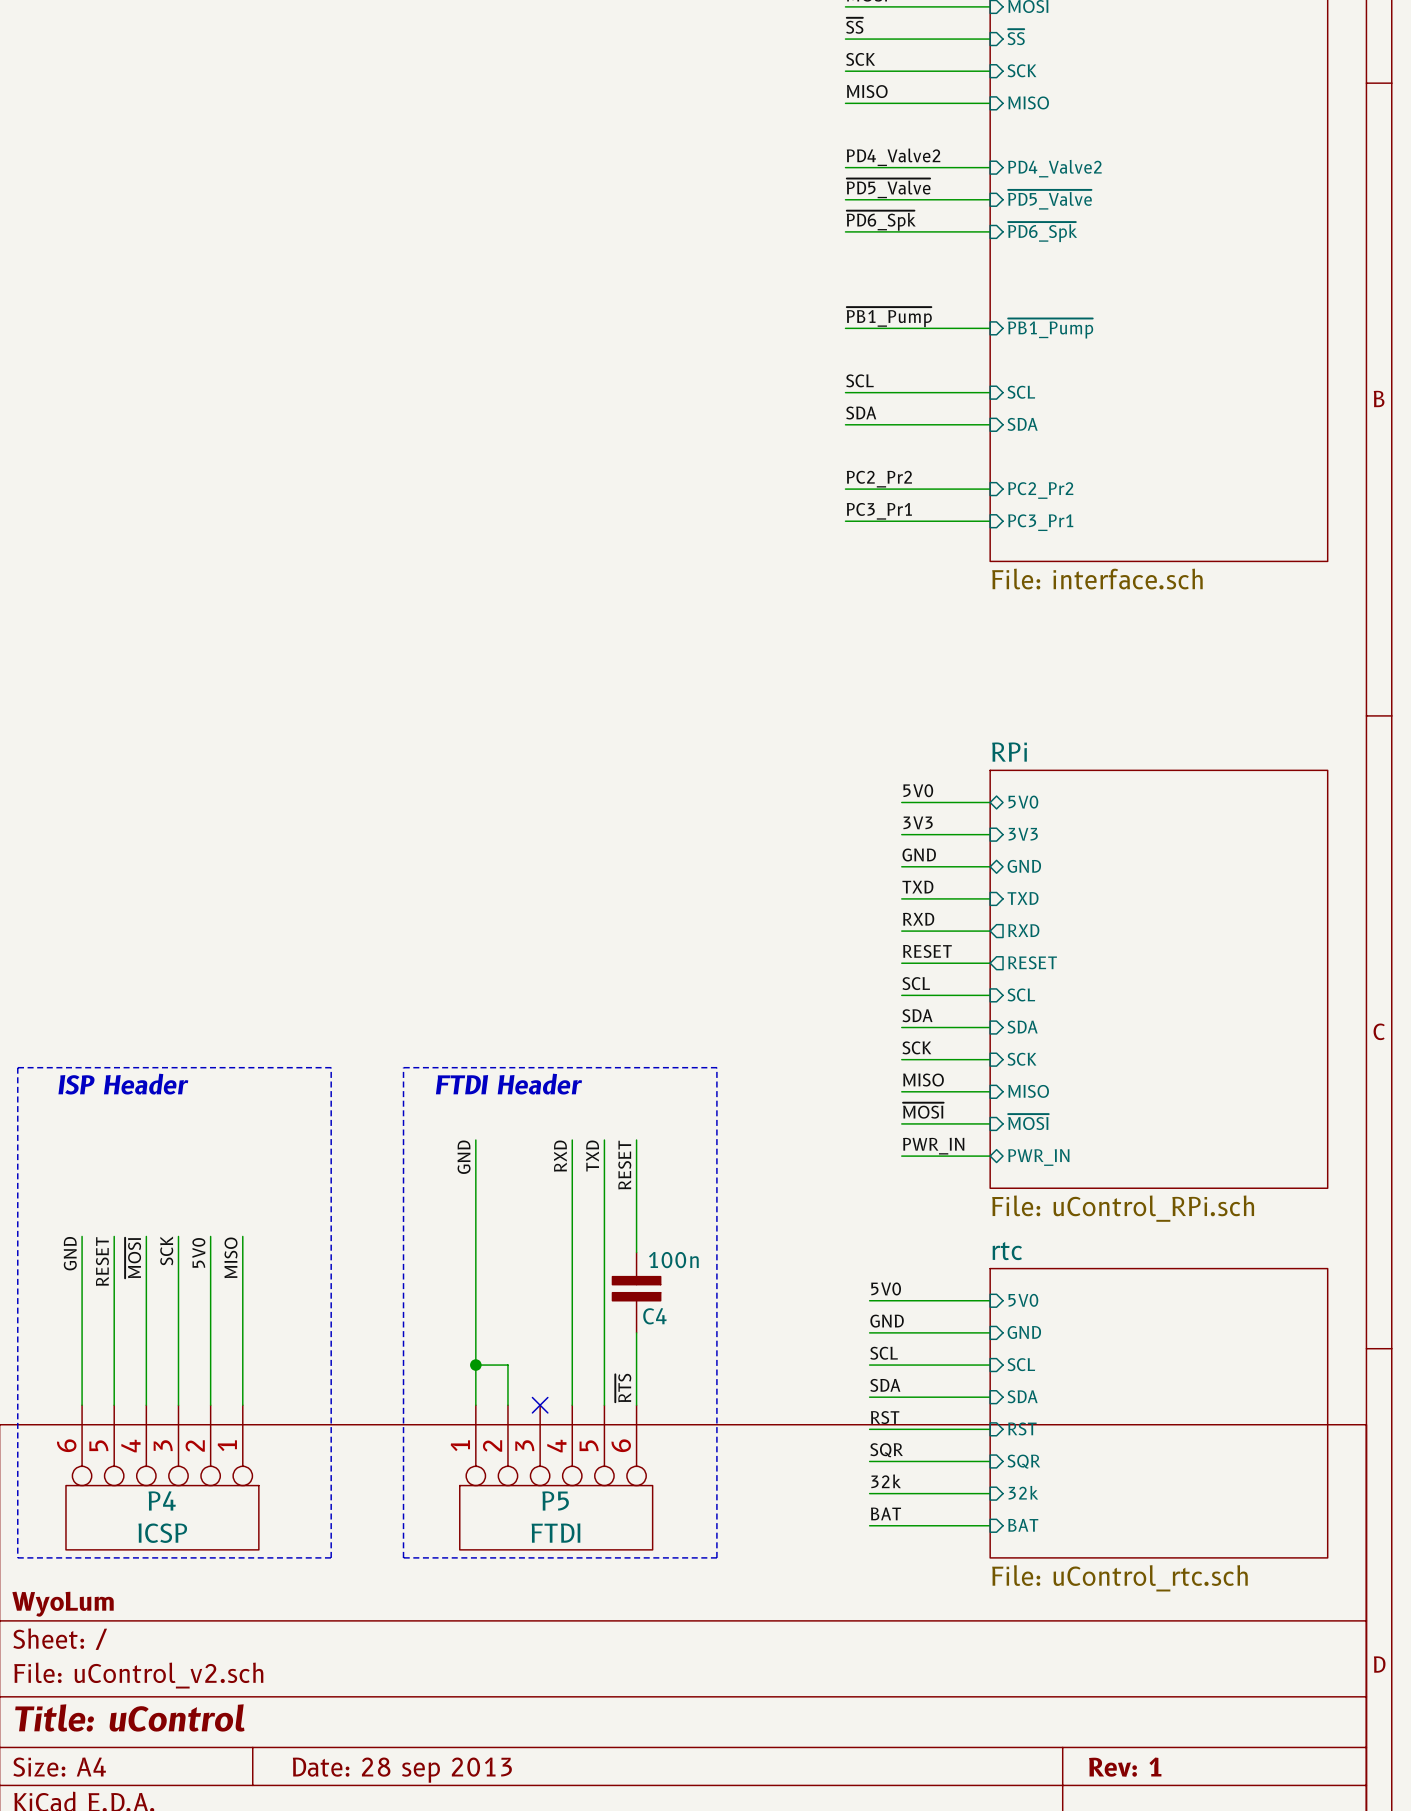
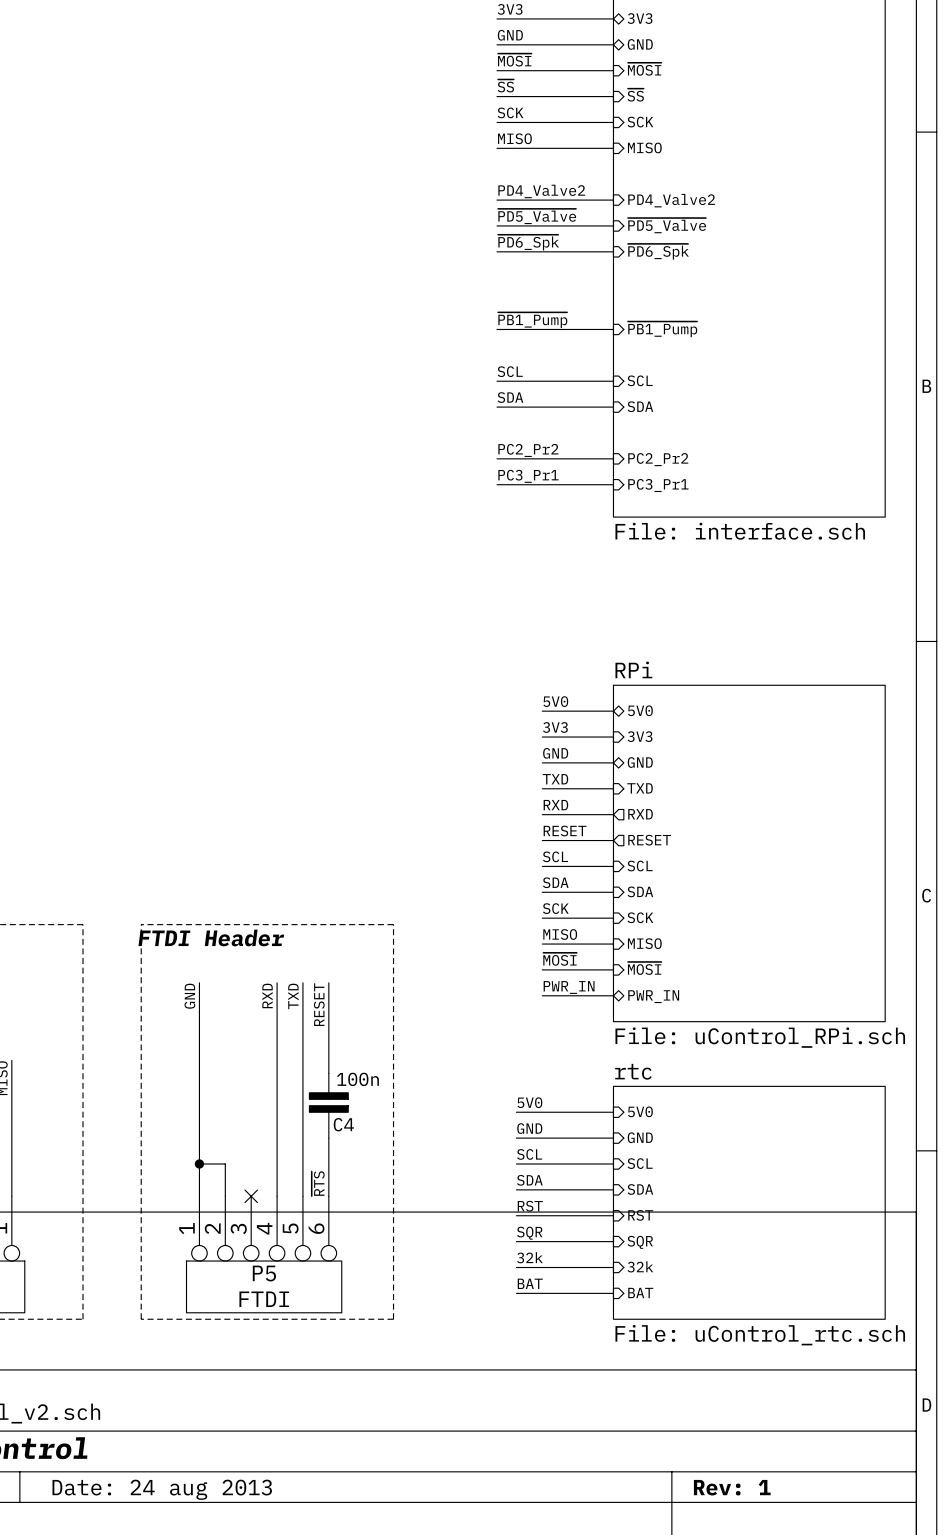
title block: Date: 28 sep 2013 (402, 1770) -> Date: 24 aug 2013 (162, 1489)

